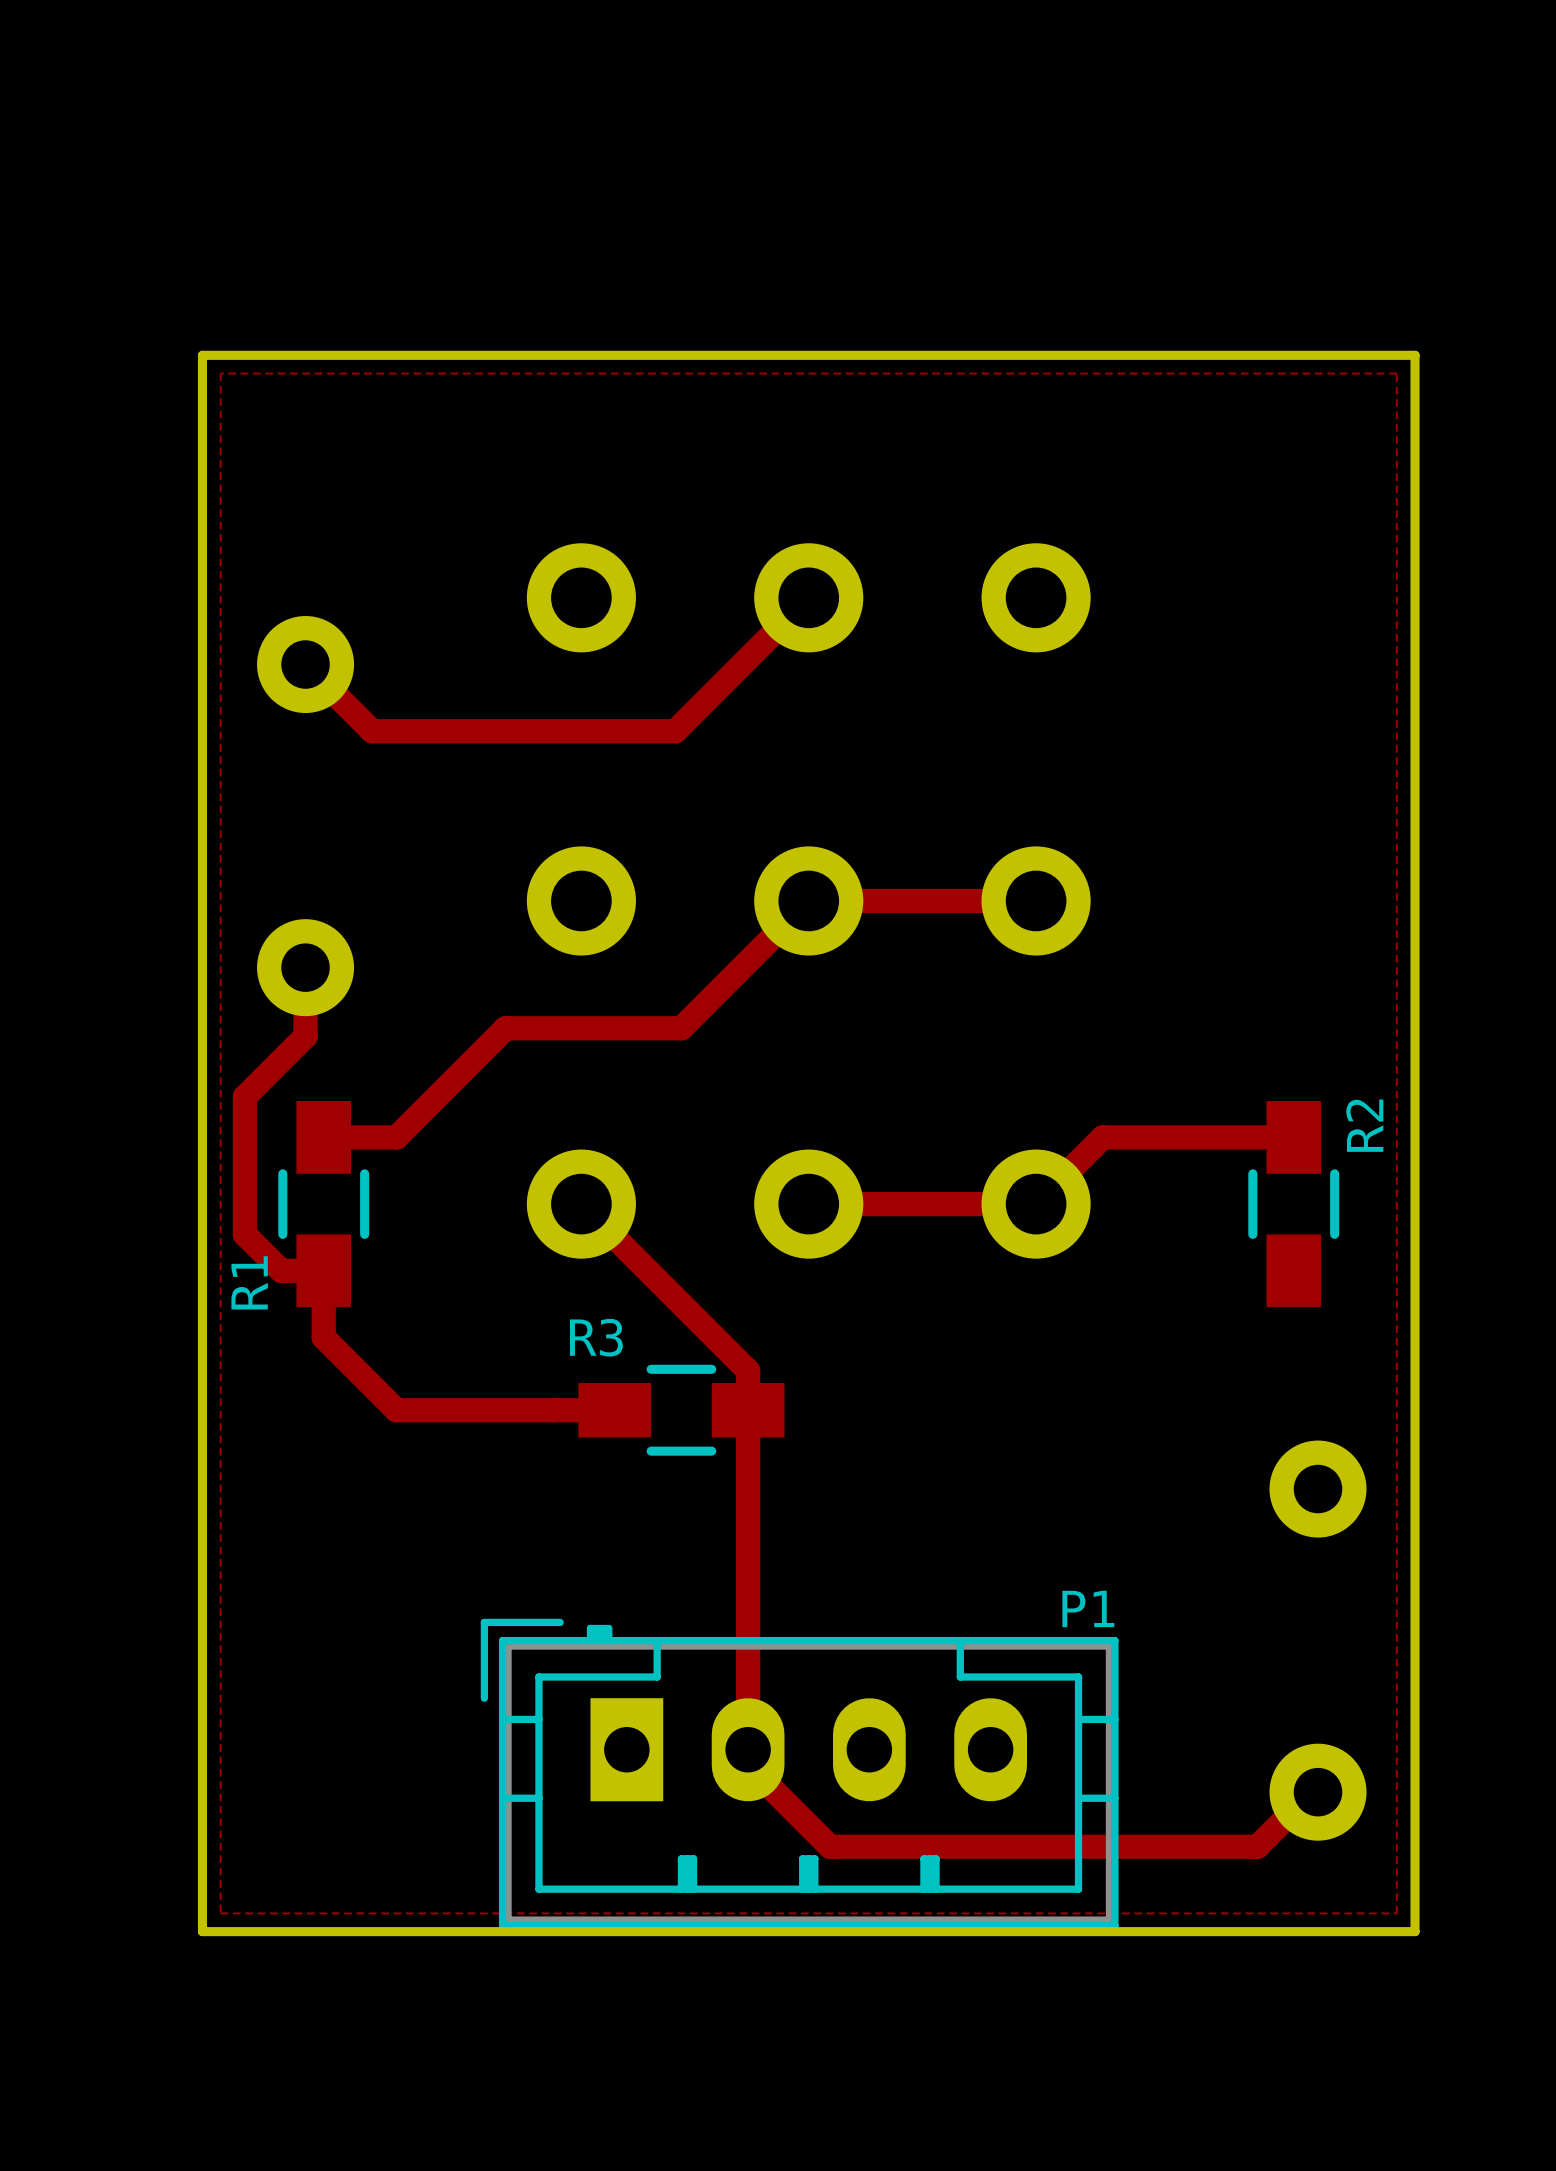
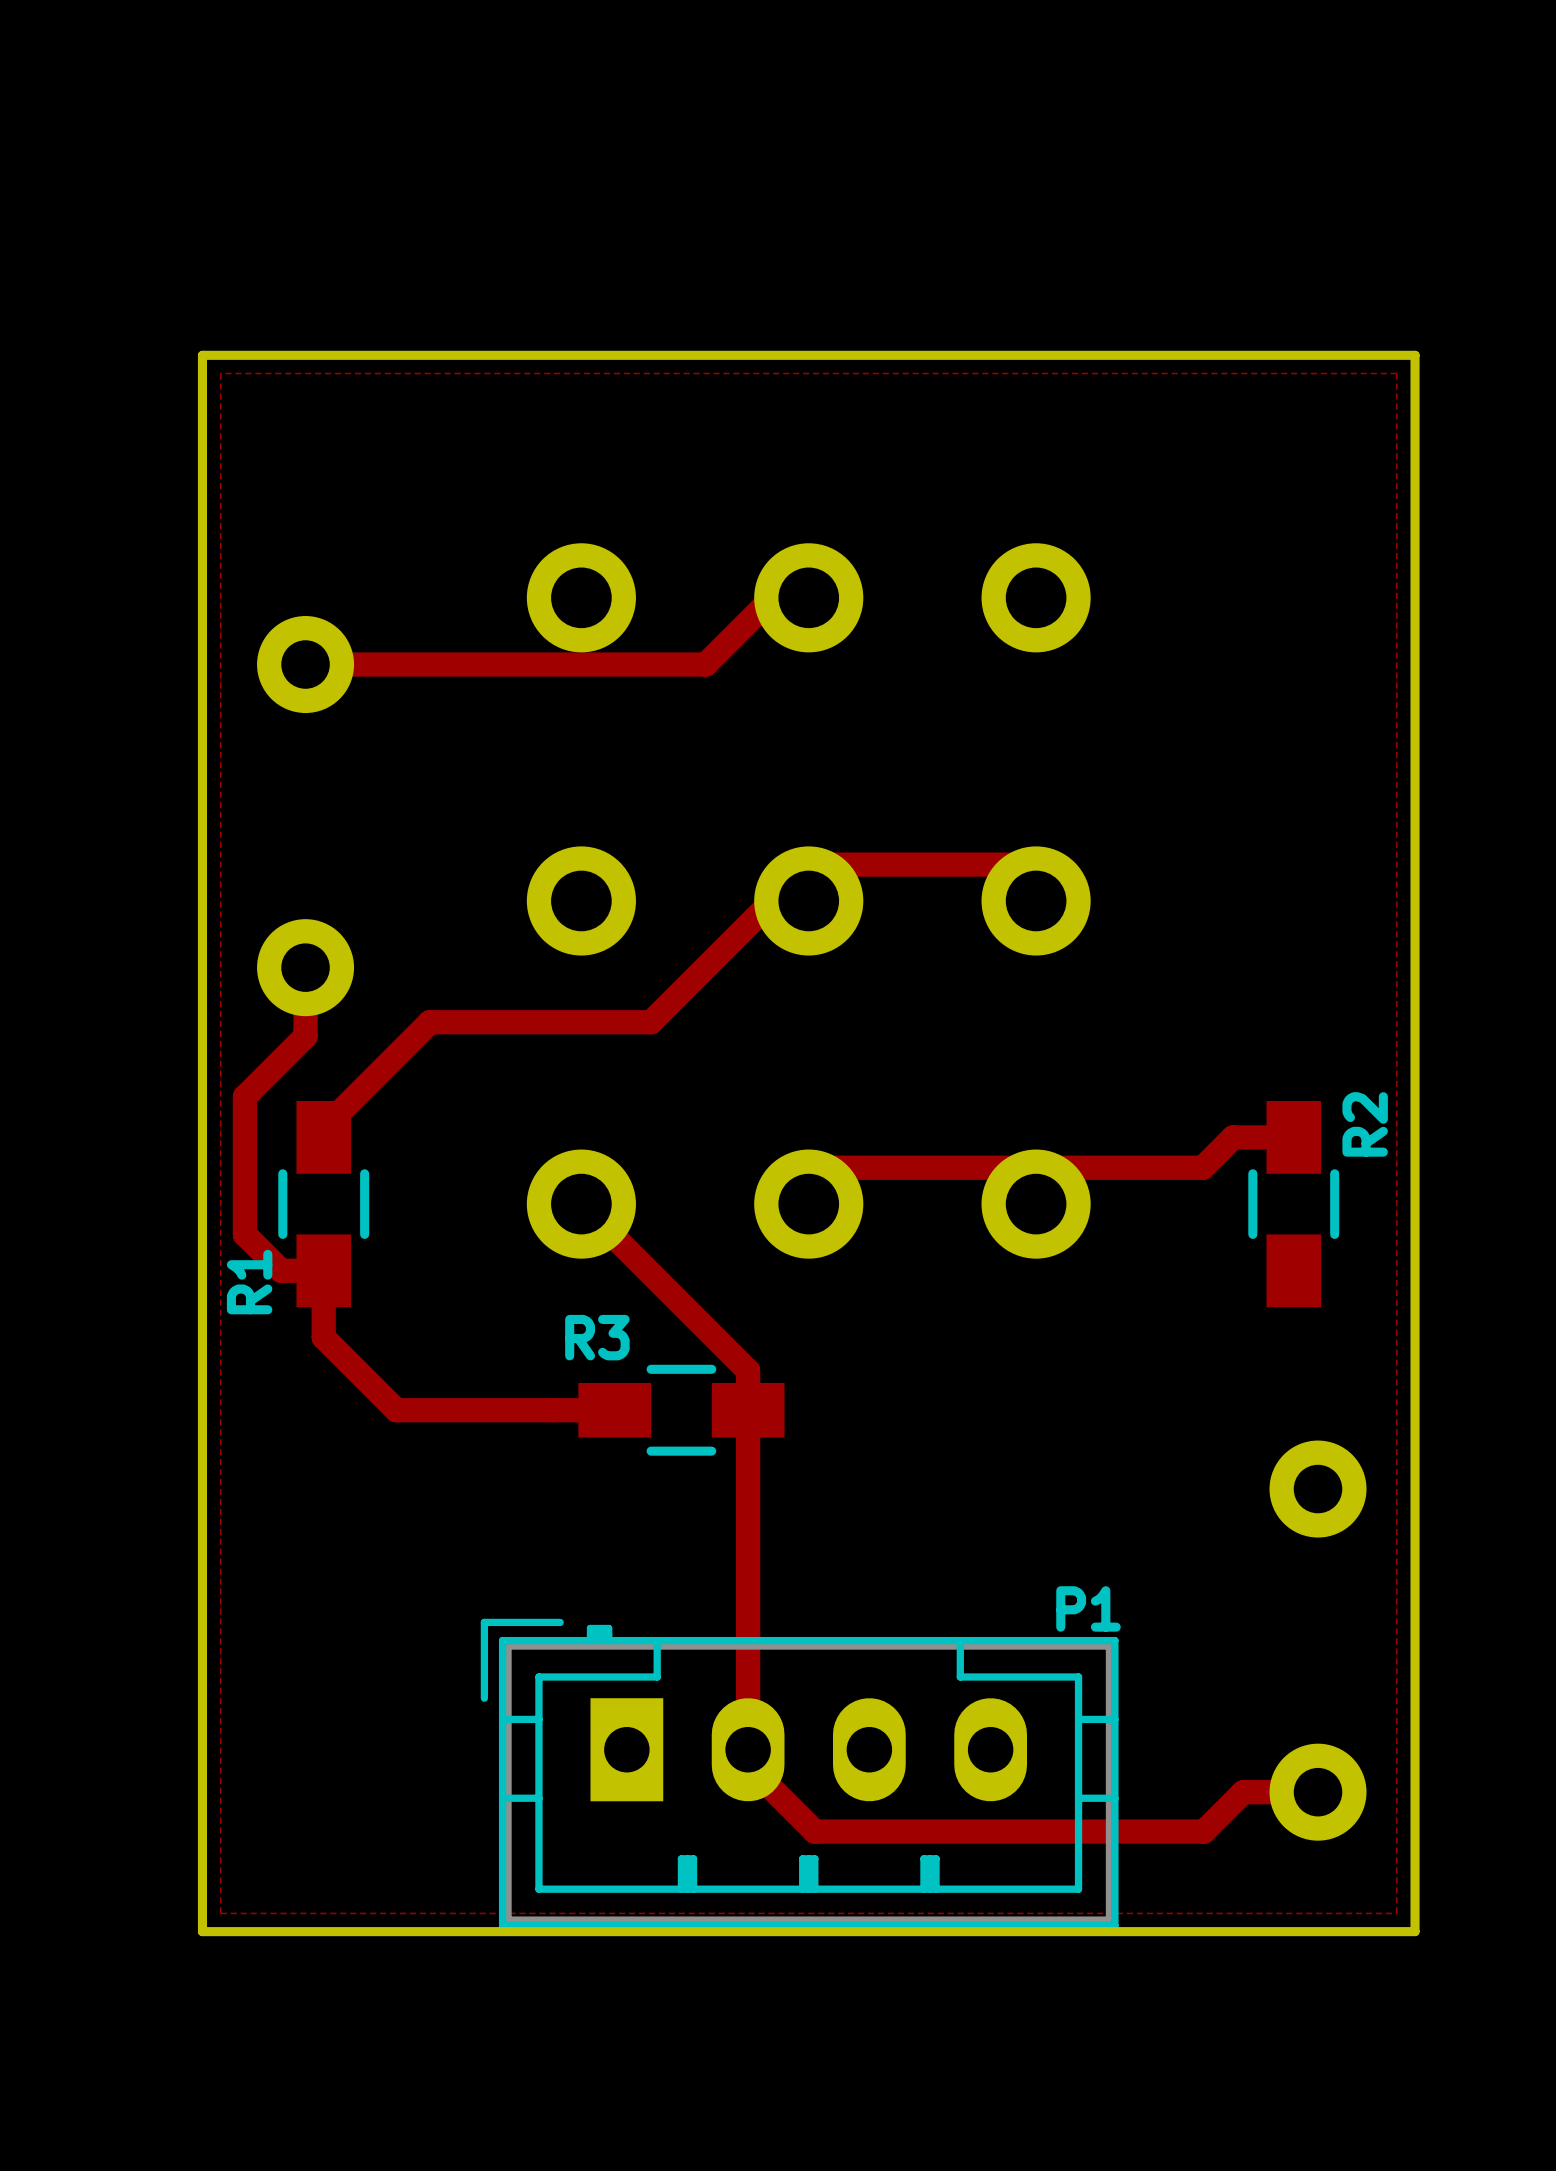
track: (808, 597) (675, 731) (372, 731) (305, 664) -> (808, 561) (705, 664) (305, 664)
track: none -> (1036, 864) (808, 864) (651, 1022) (429, 1022) (323, 1128)
track: (1036, 900) (808, 900) (681, 1028) (505, 1028) (396, 1137) (323, 1137) -> none
track: (1233, 1137) (1102, 1137) (1036, 1204) (808, 1204) -> (1233, 1137) (1202, 1167) (808, 1167)
track: (1311, 1792) (1257, 1846) (829, 1846) (814, 1831) -> (1311, 1792) (1243, 1792) (1203, 1831) (814, 1831)

